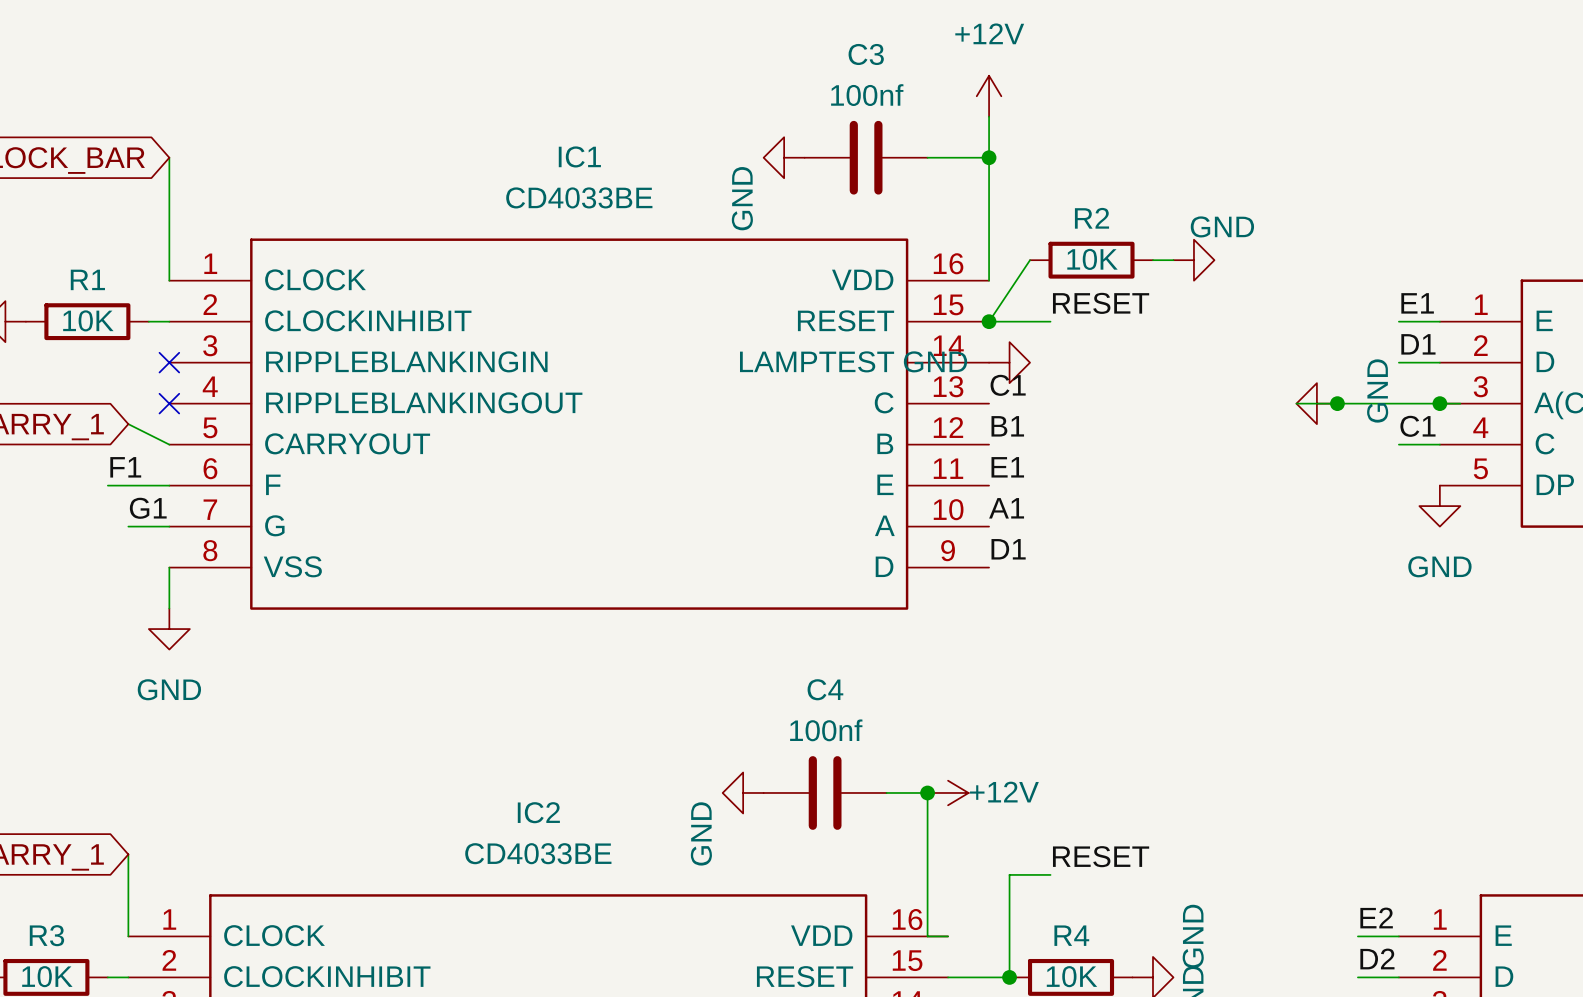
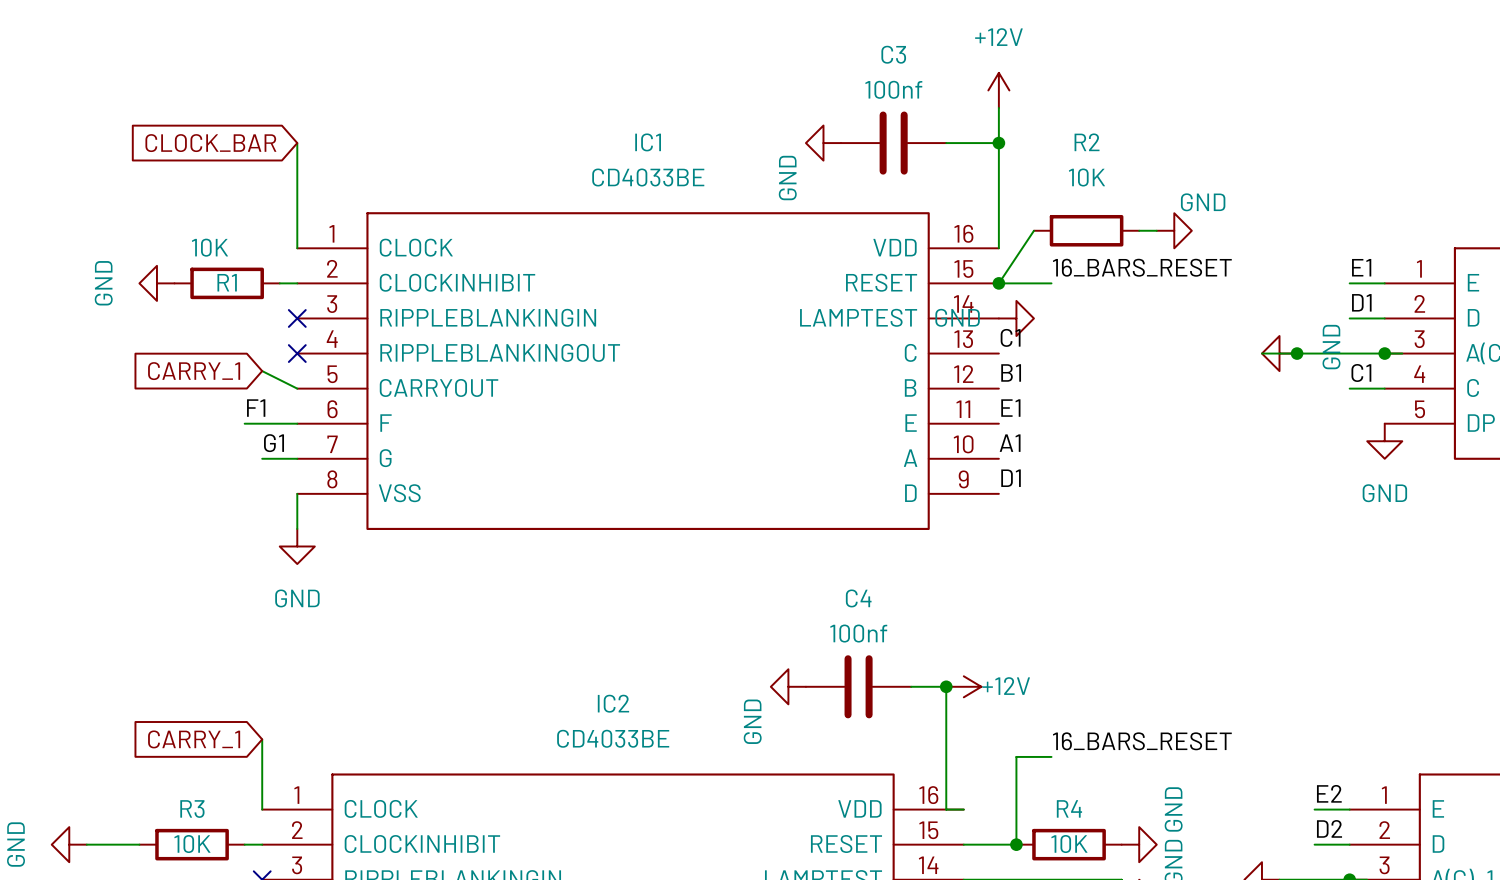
R2 name position: R2 (1091, 218) -> R2 (1087, 142)
R2 value position: 10K (1092, 259) -> 10K (1086, 177)
R1 name position: R1 (87, 279) -> R1 (227, 282)
label: RESET (1101, 303) -> 16_BARS_RESET (1142, 267)
R1 value position: 10K (88, 320) -> 10K (209, 247)
label: RESET (1101, 856) -> 16_BARS_RESET (1142, 741)

